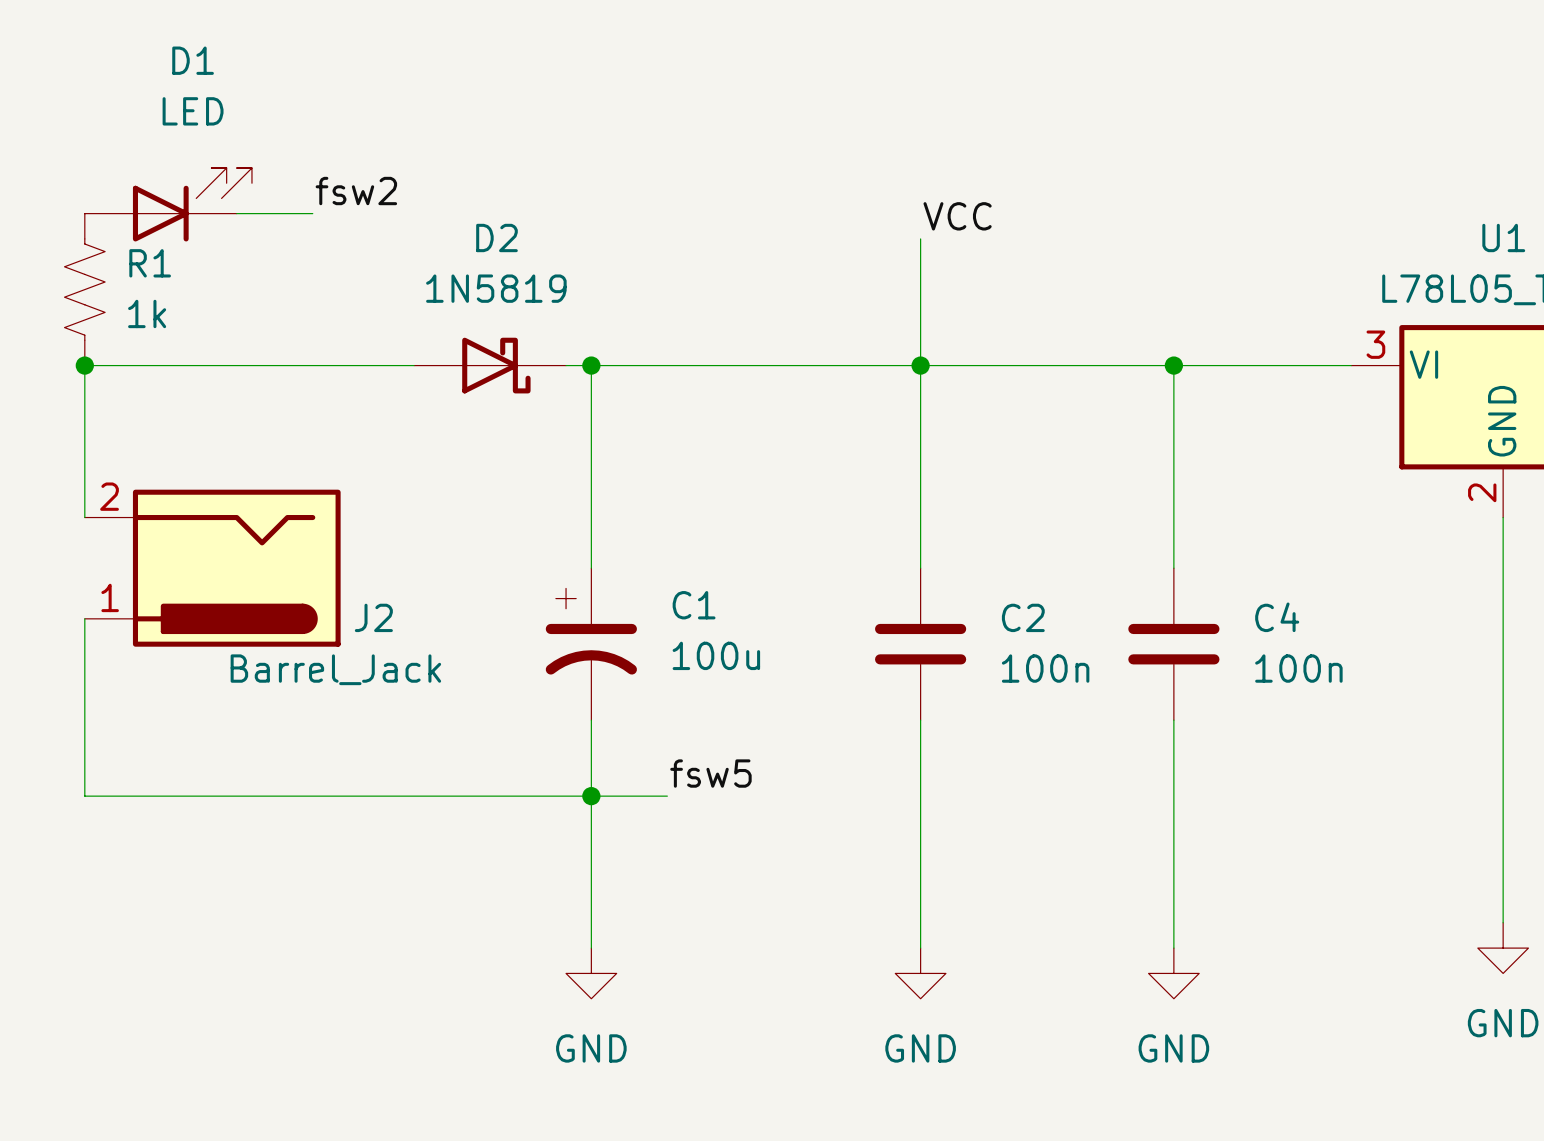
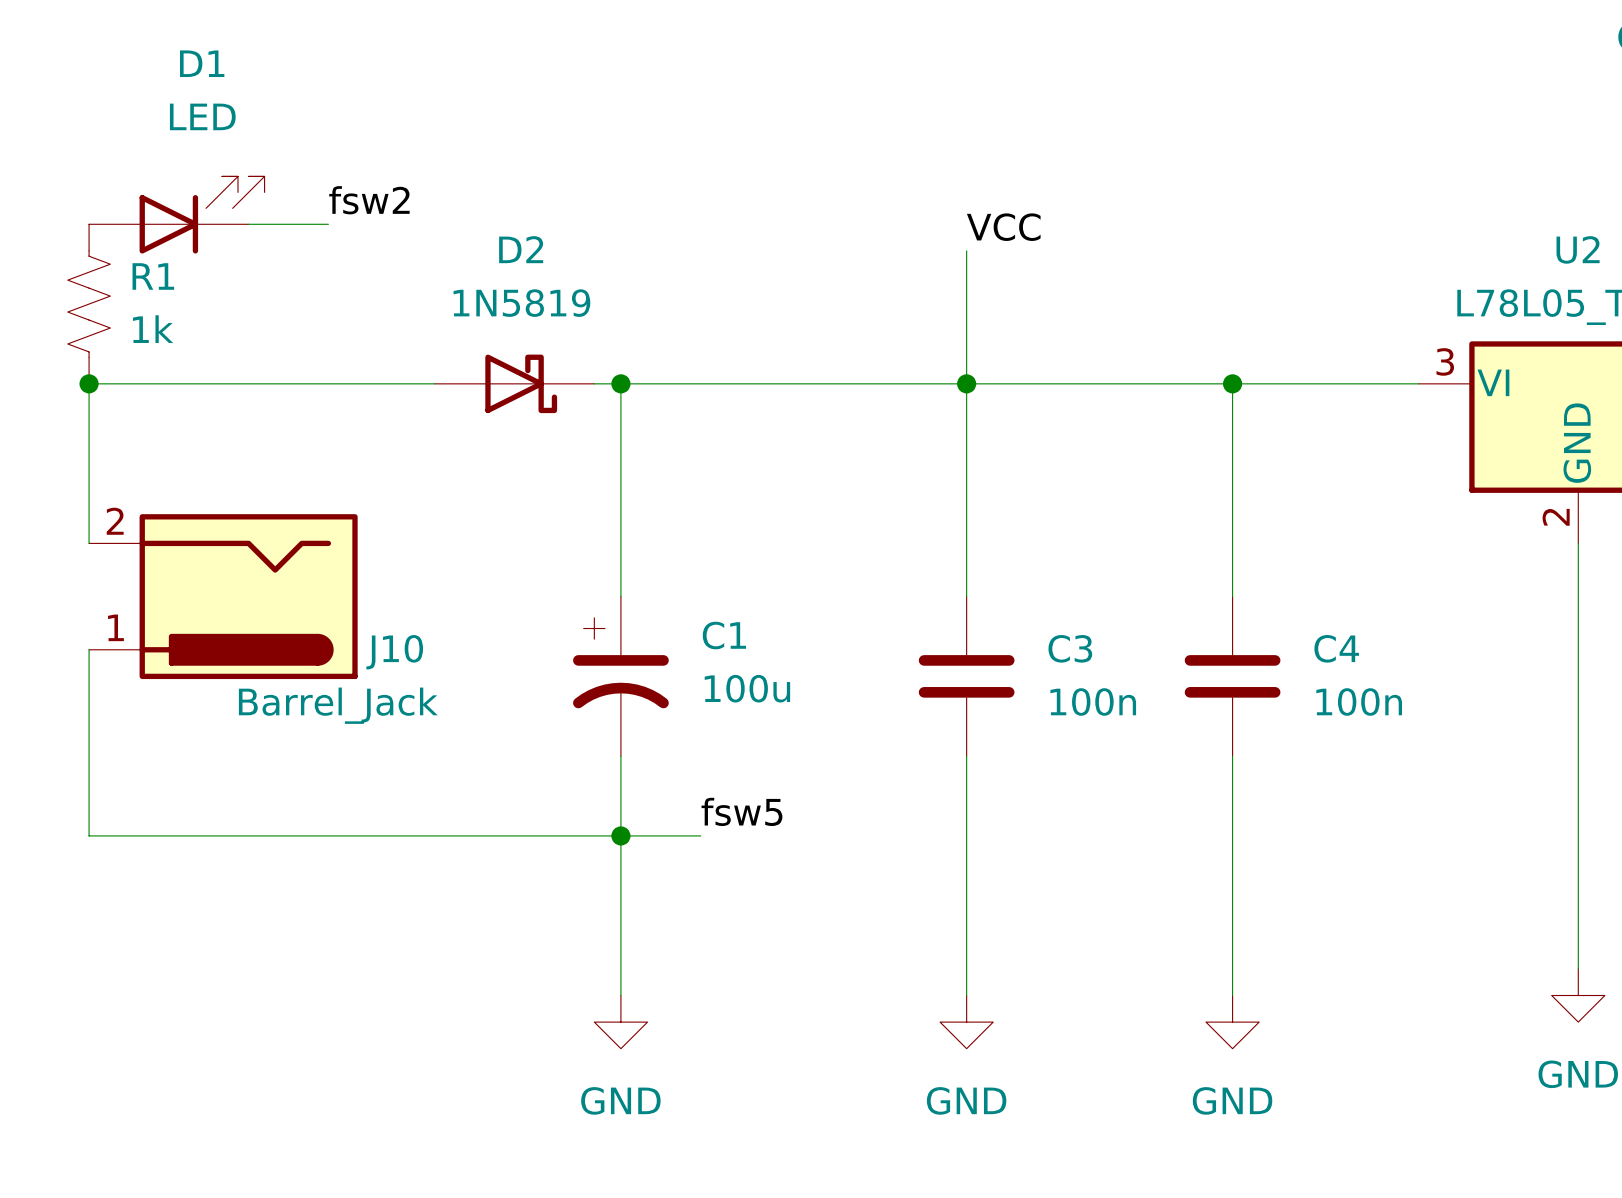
U1 name: U1 (1503, 237) -> U2 (1578, 249)
J2 name: J2 (373, 617) -> J10 (394, 652)
C2 name: C2 (1023, 617) -> C3 (1070, 648)

